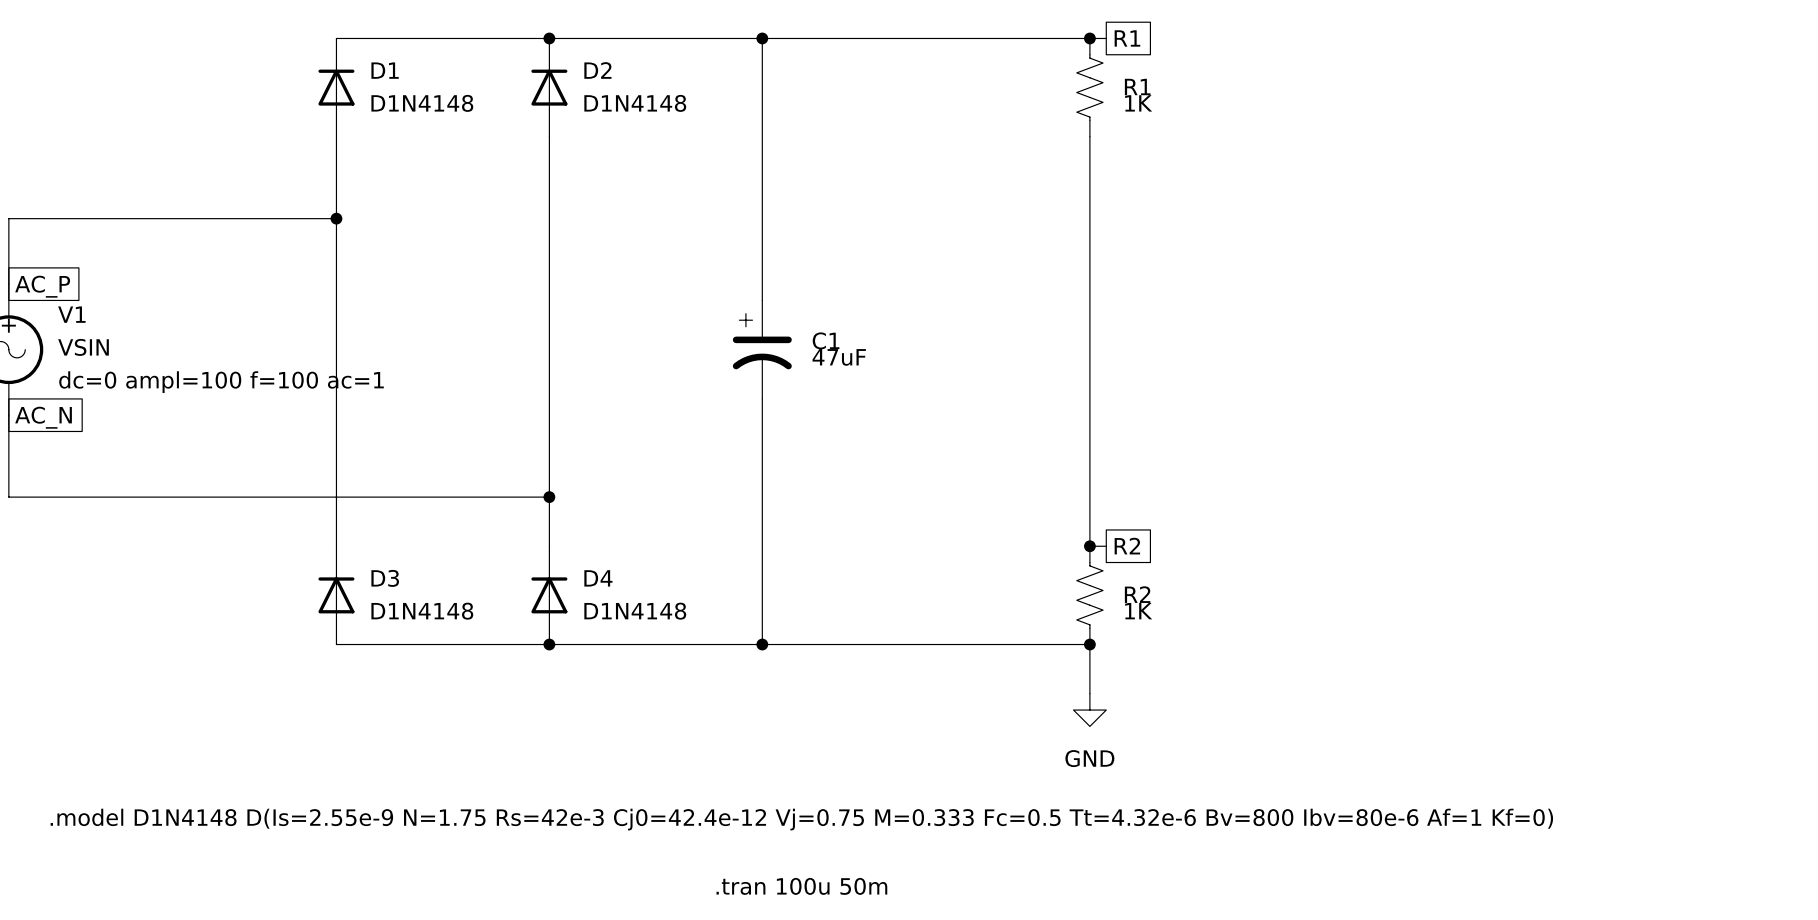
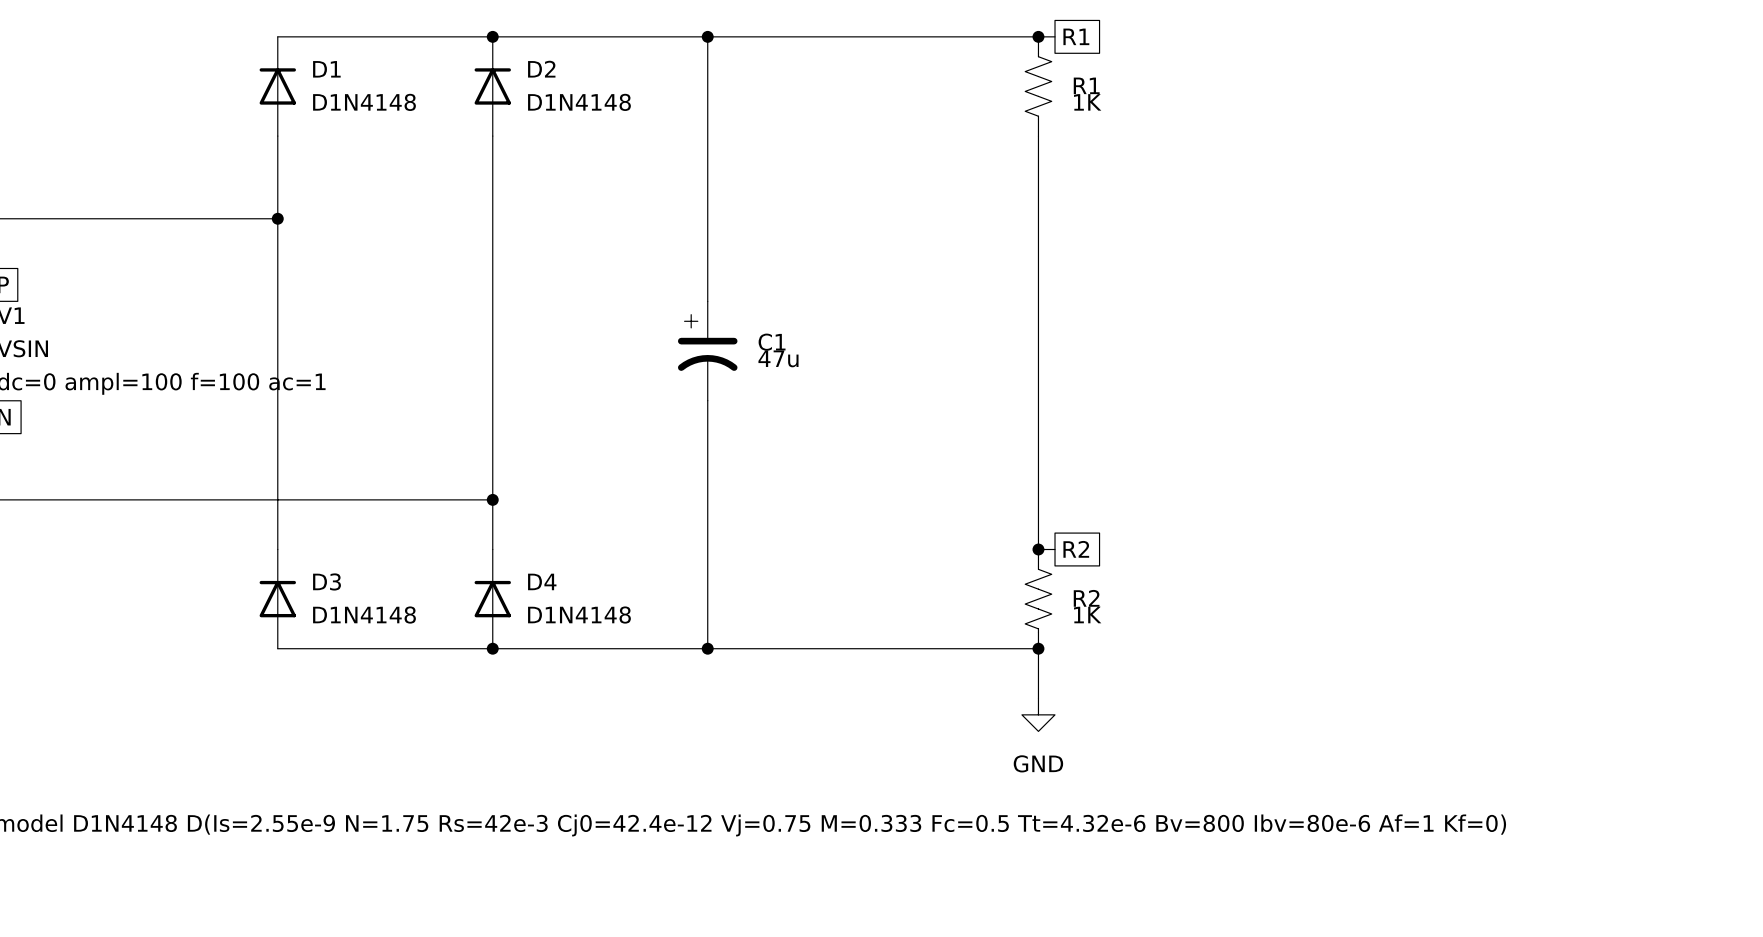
C1 value: 47uF (839, 357) -> 47u (778, 358)
text: .tran 100u 50m (801, 886) -> none

